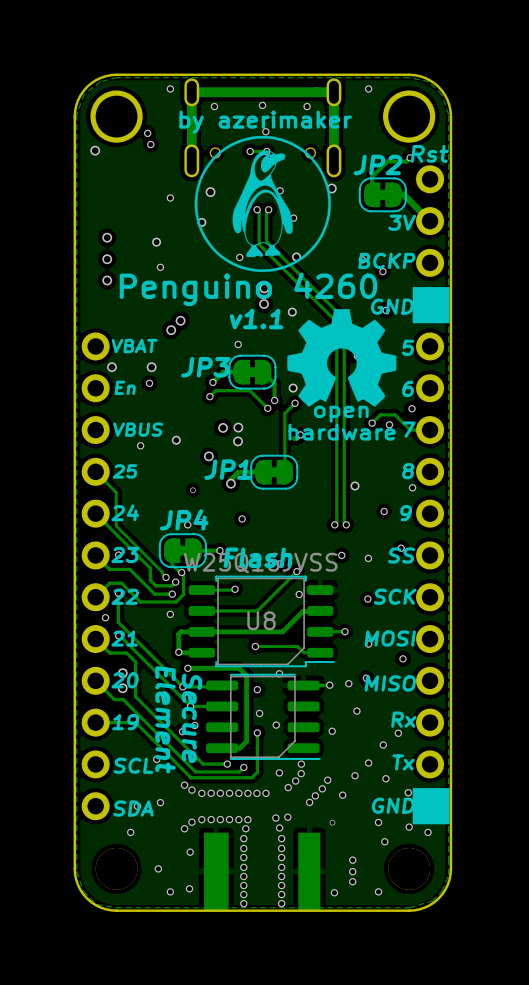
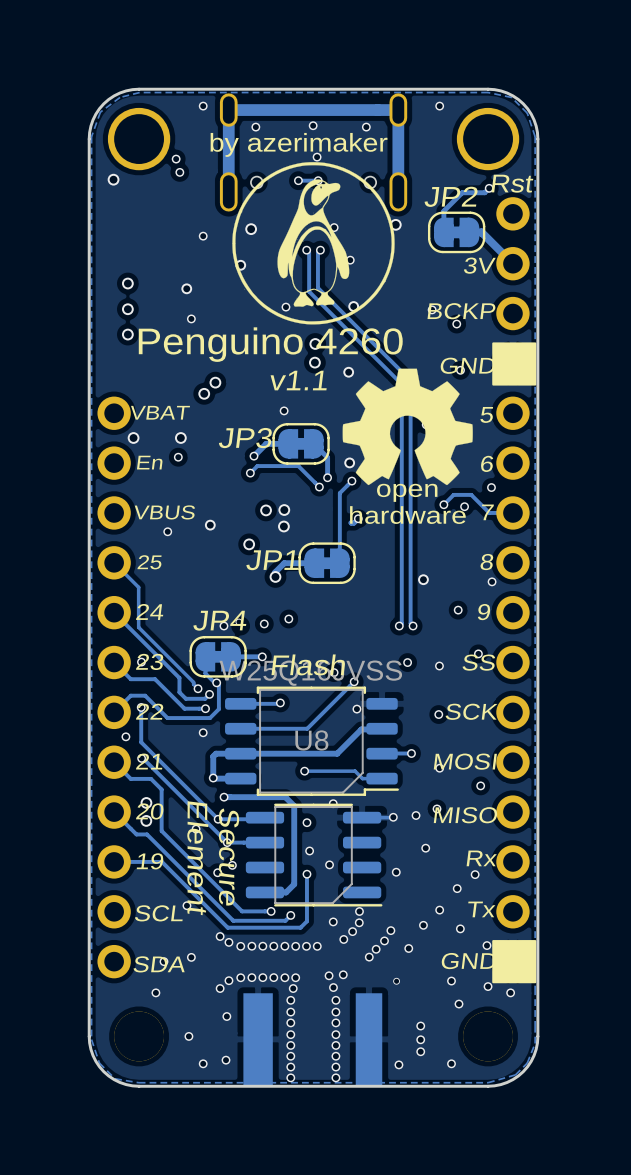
via: (192, 490) -> none
via: none -> (264, 623)

